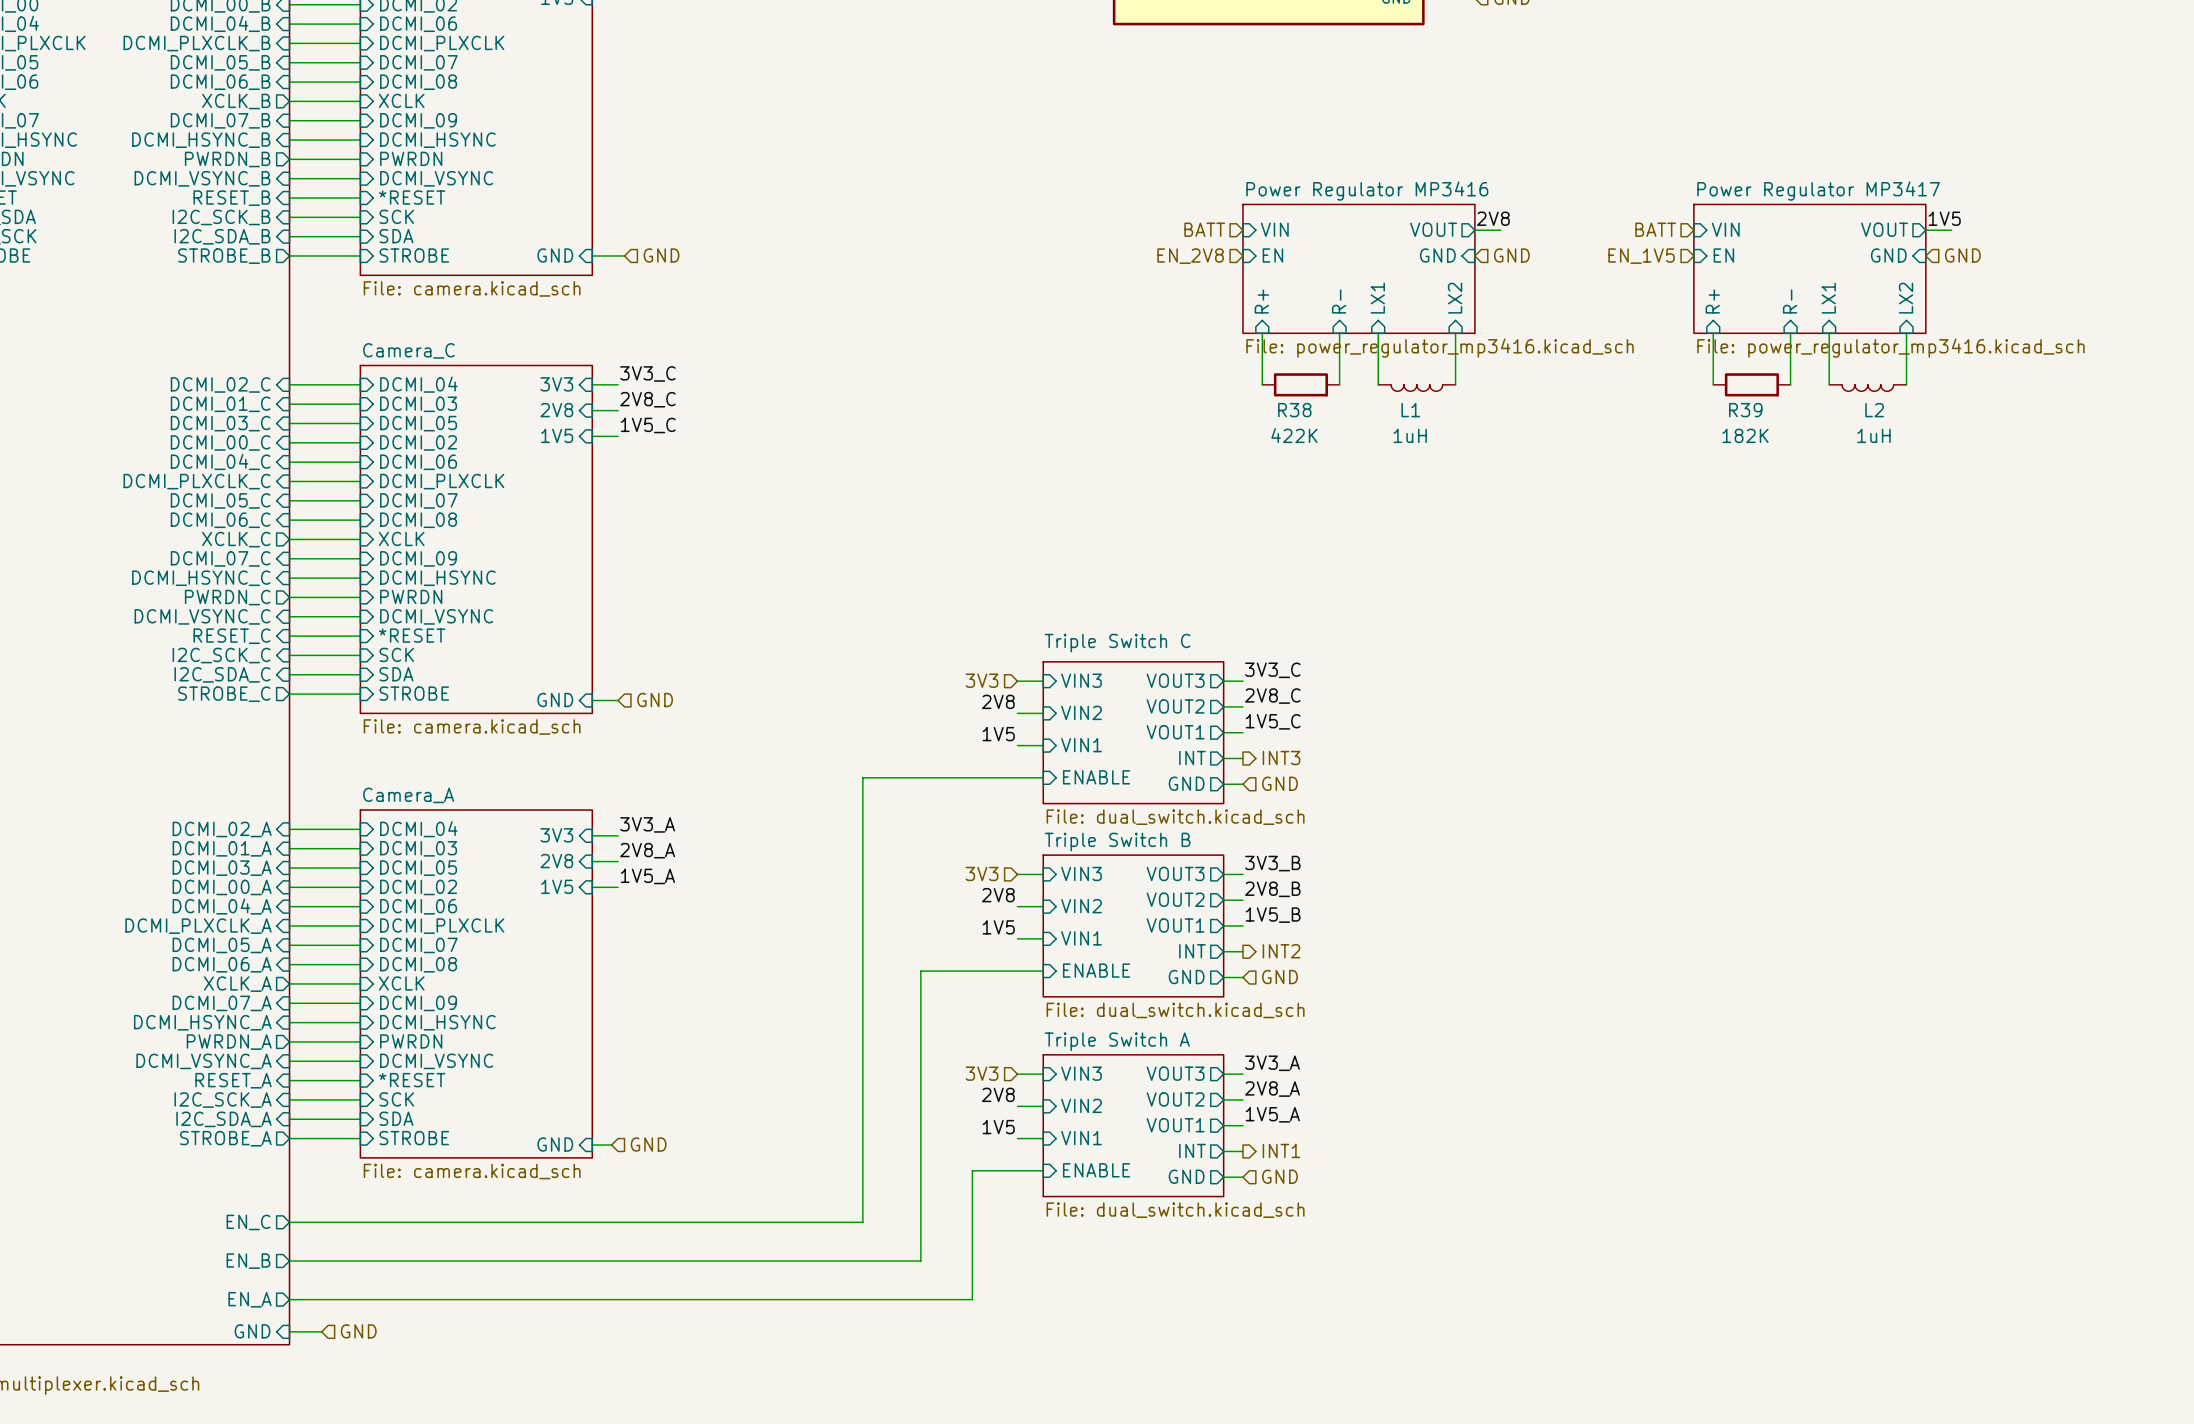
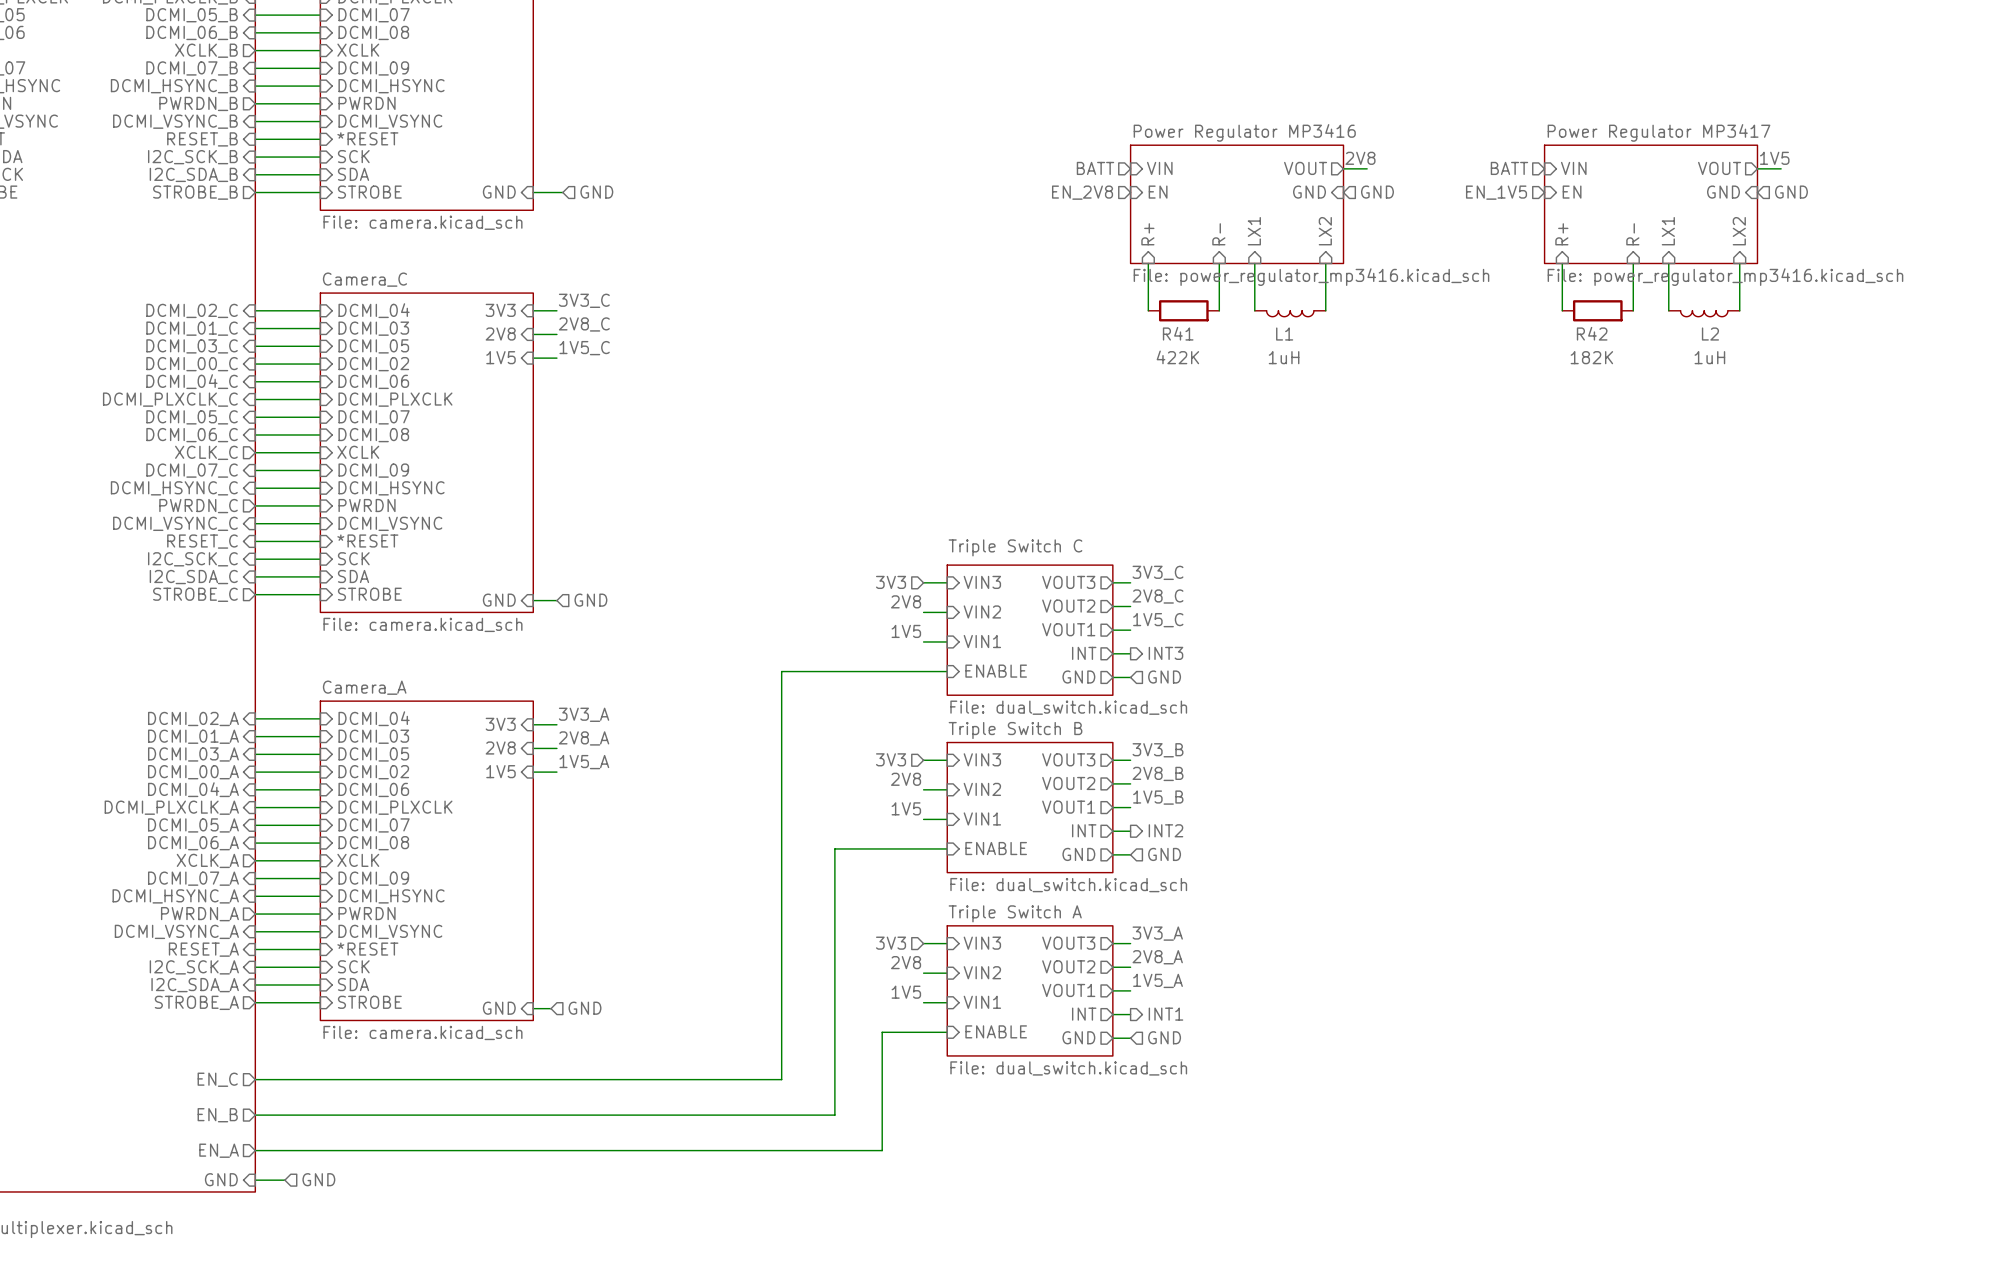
R38 name: R38 (1294, 410) -> R41 (1178, 333)
R39 name: R39 (1745, 410) -> R42 (1592, 333)

